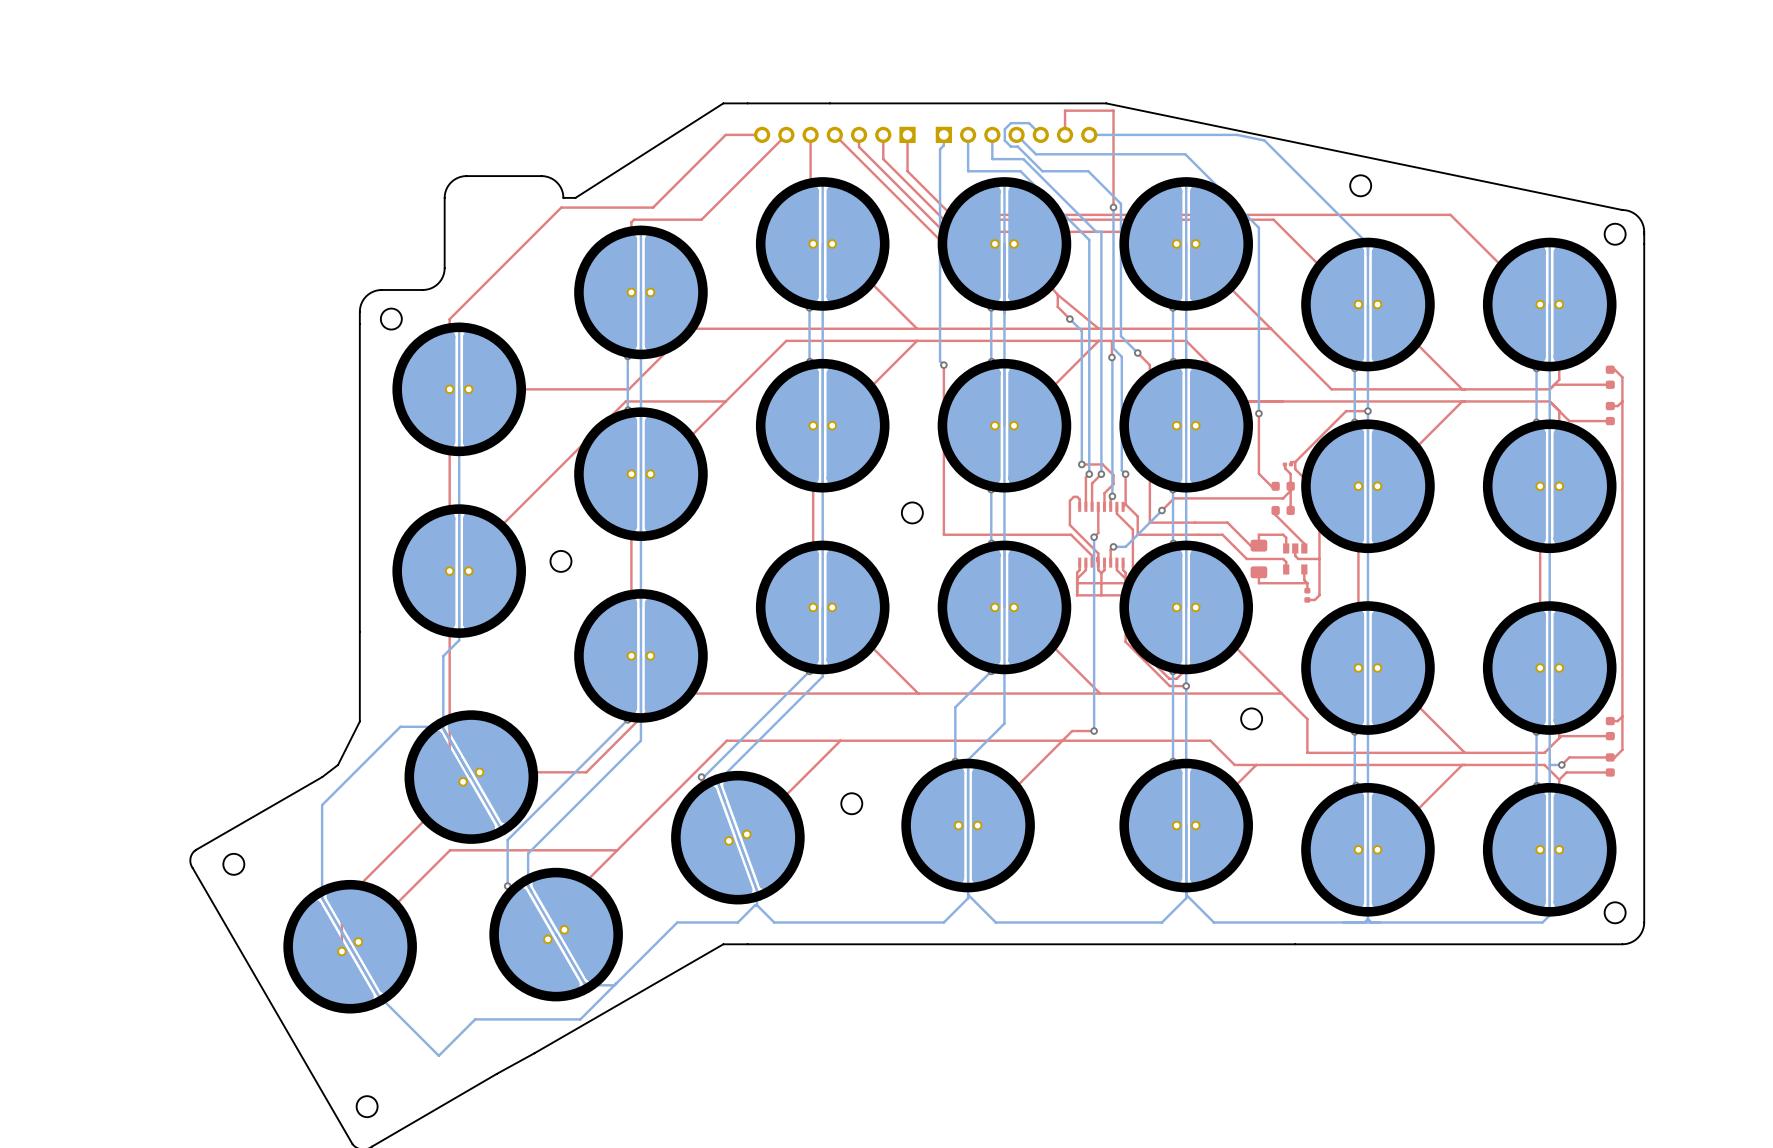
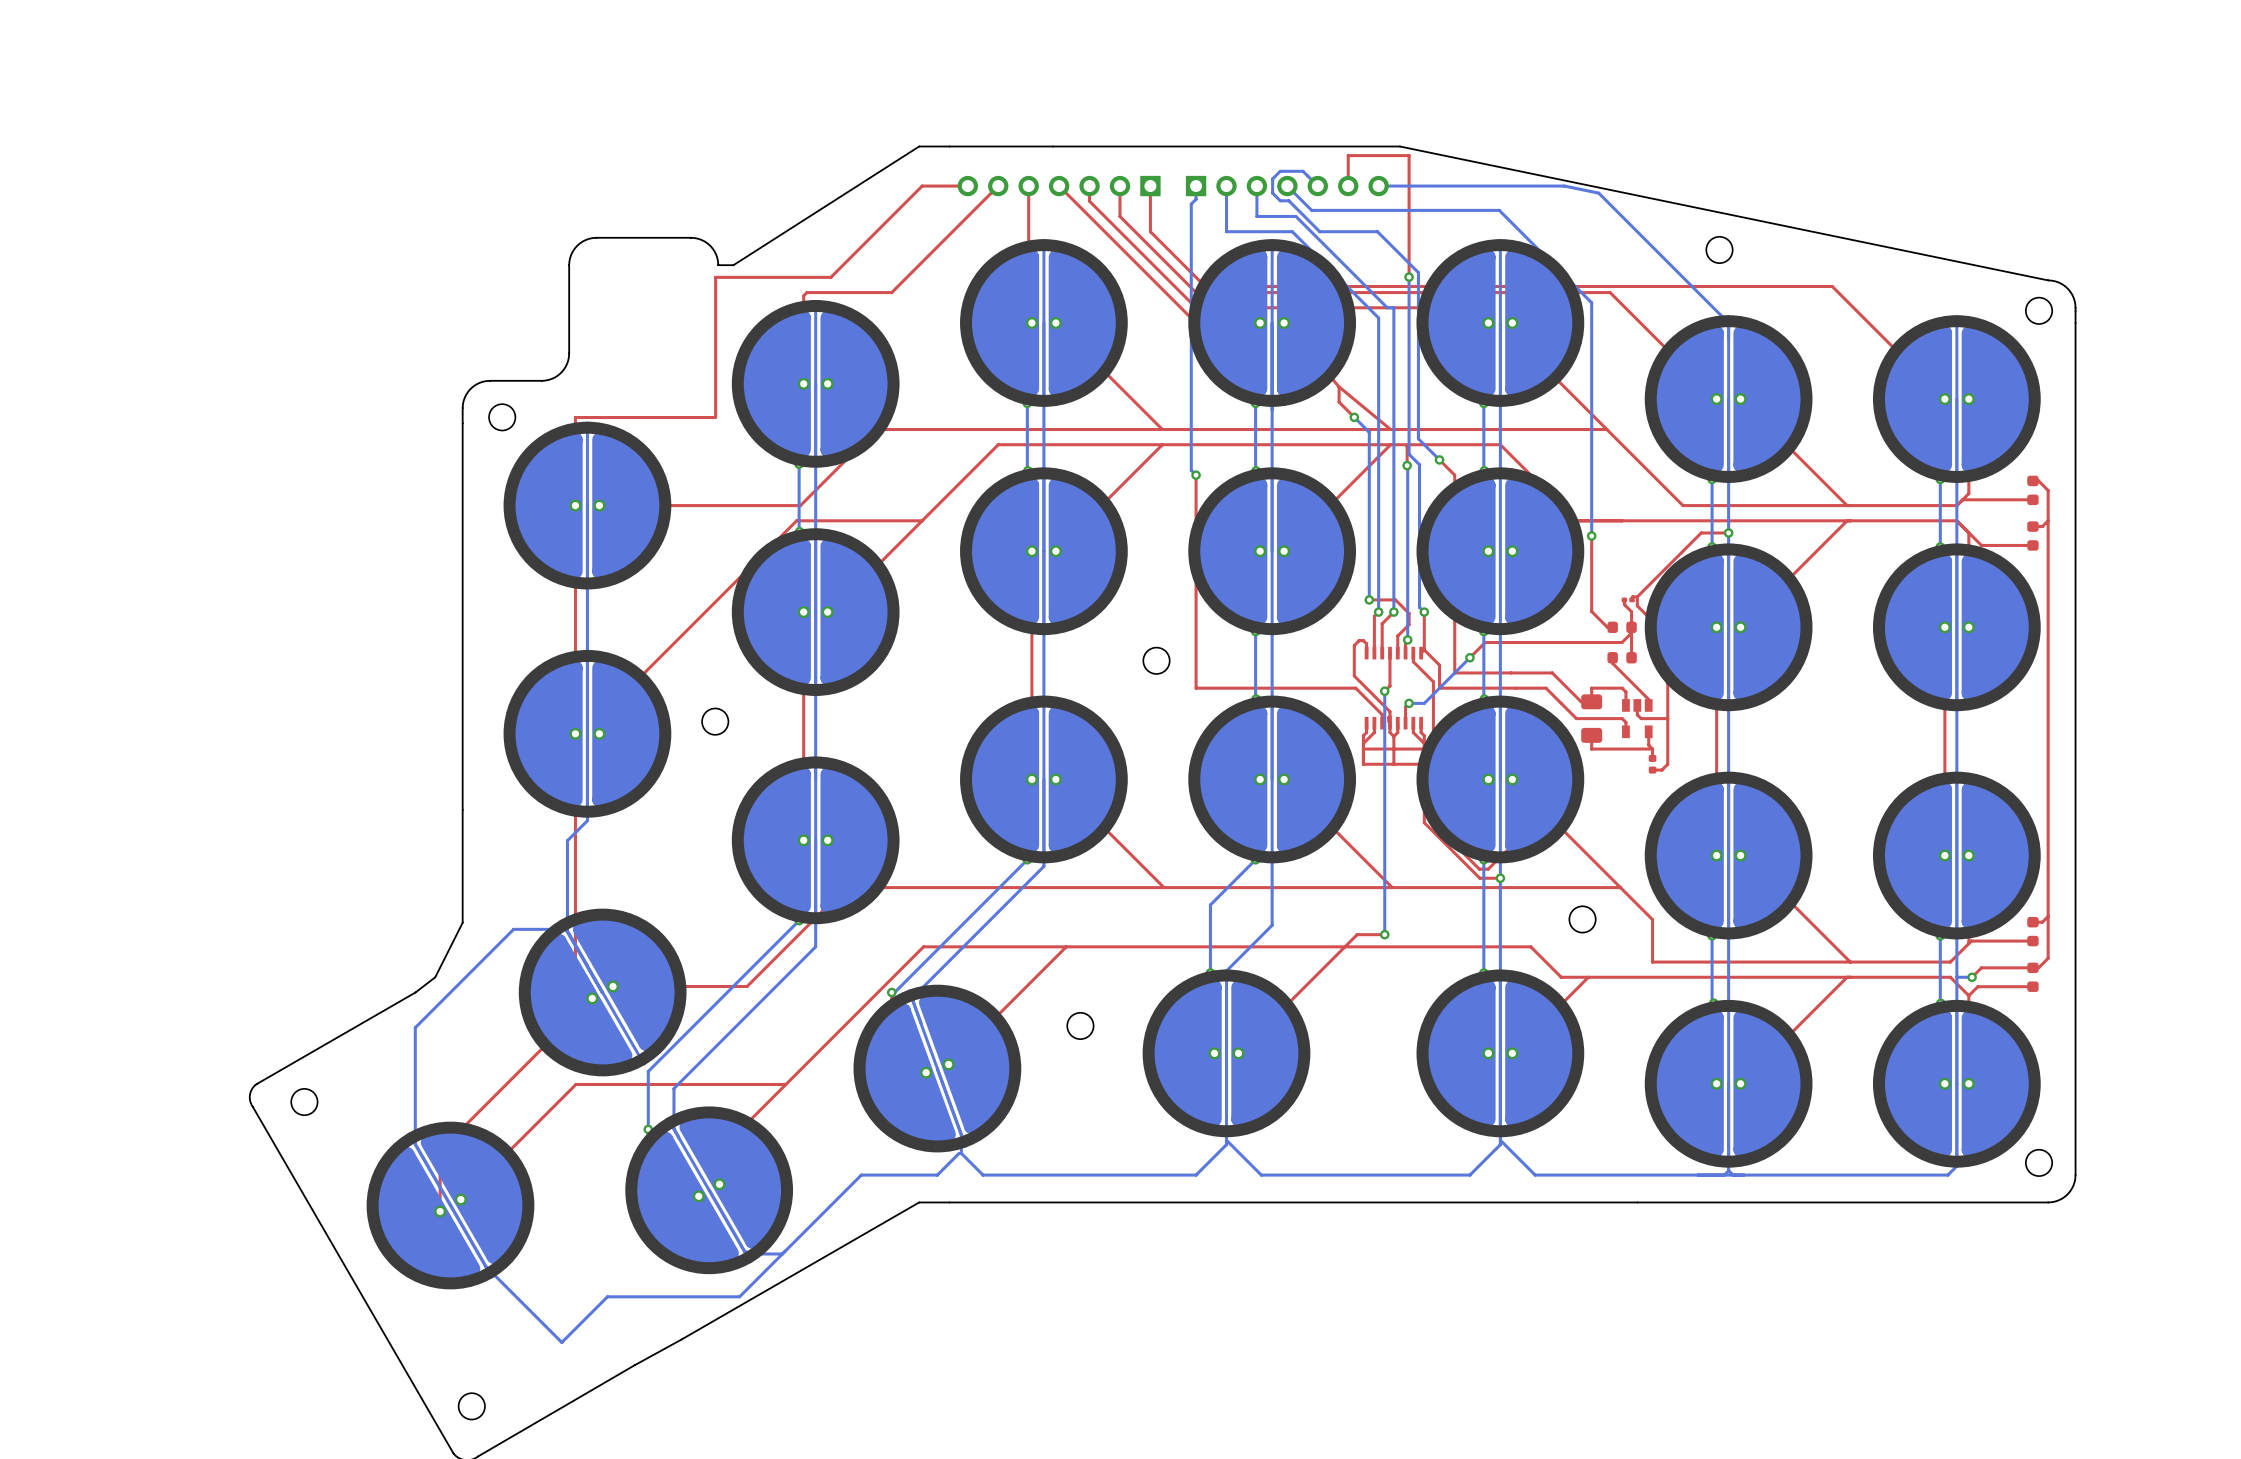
top track: (561, 207) (449, 319) -> (715, 277) (715, 416) (575, 417)

